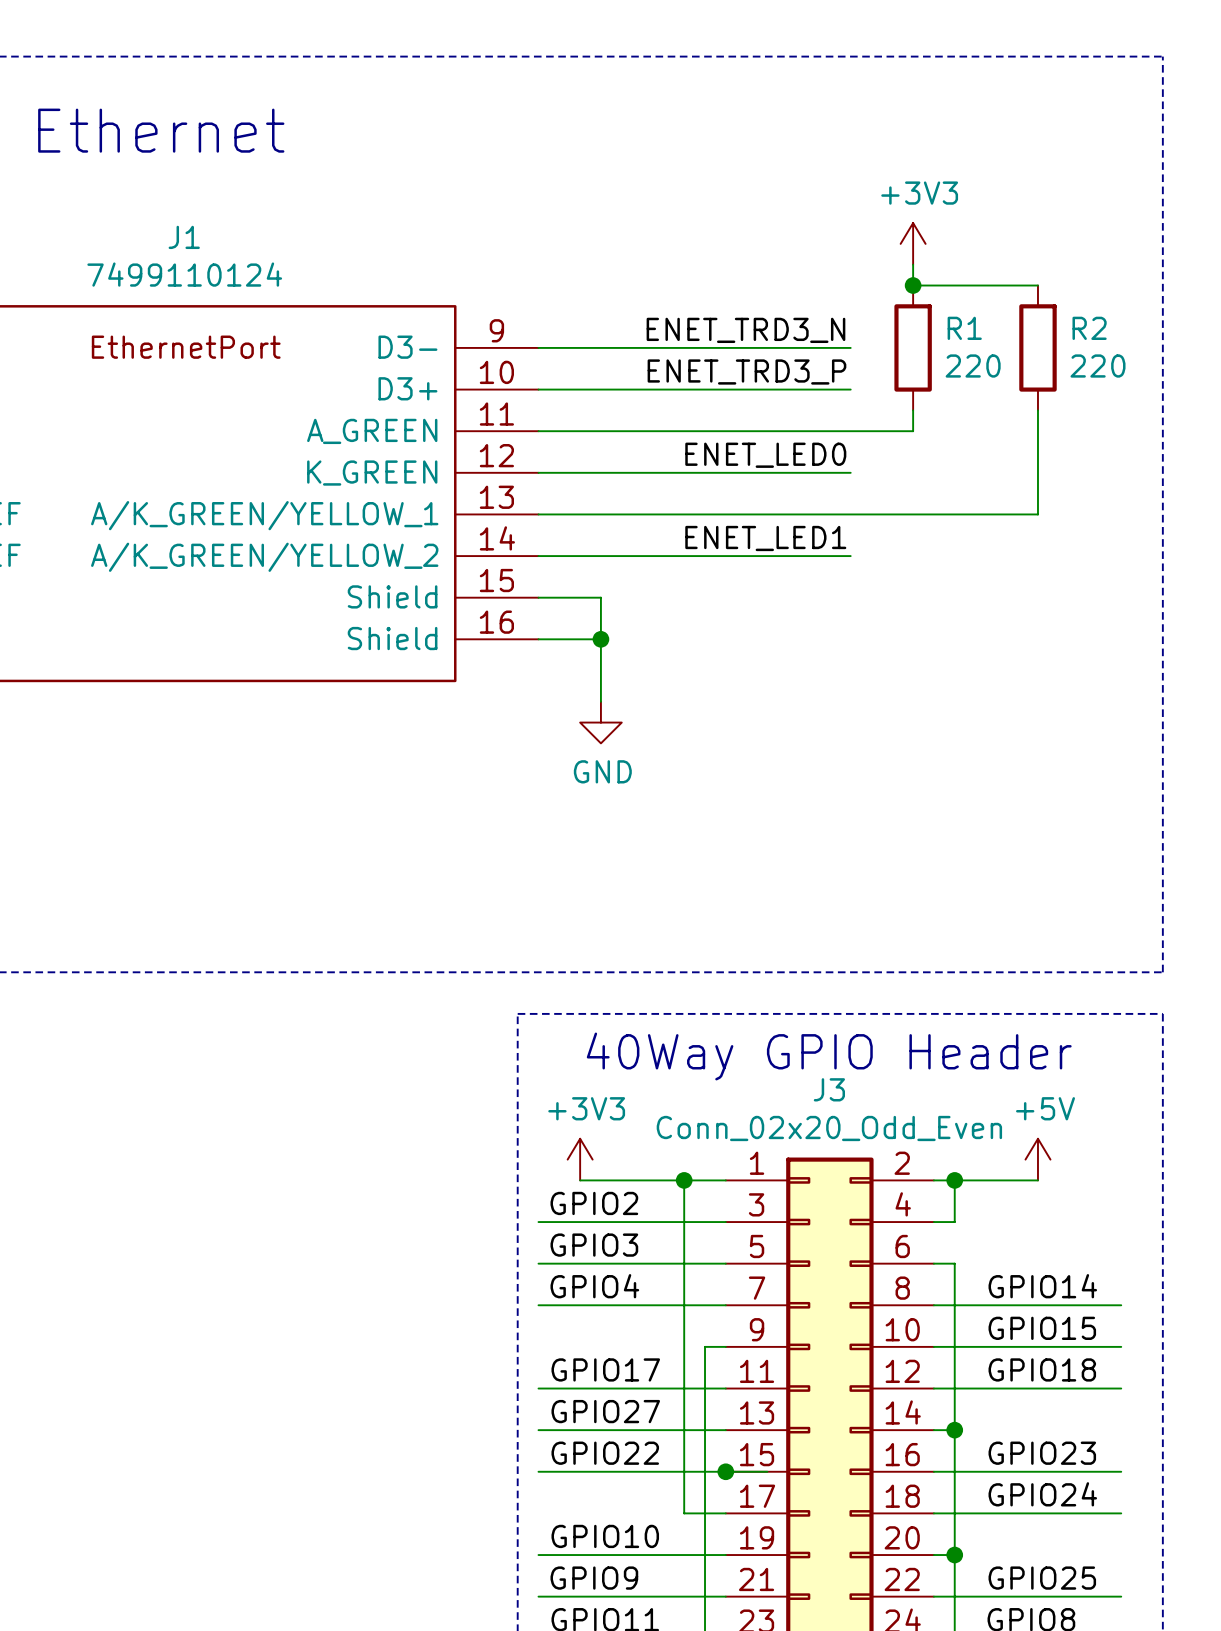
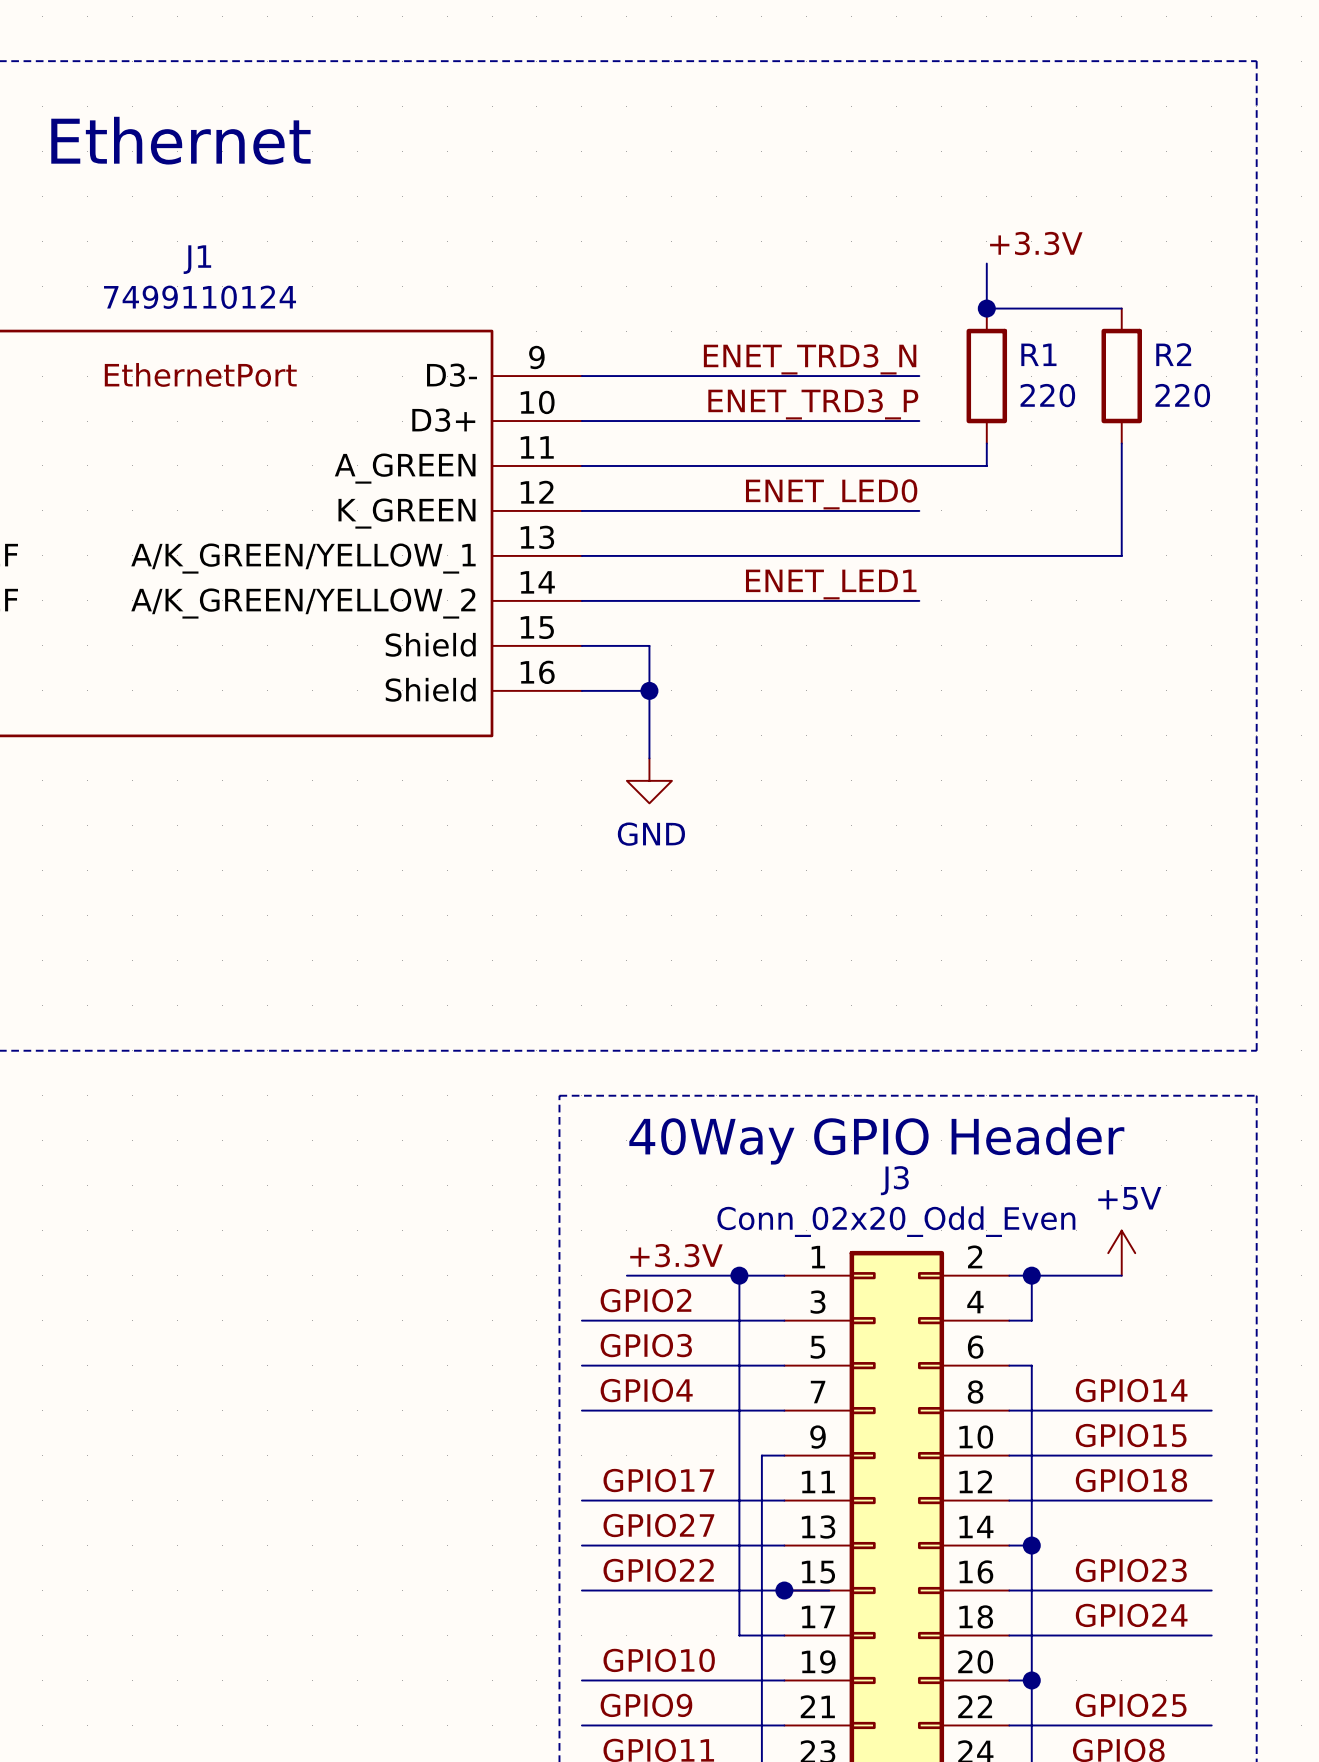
label: none -> +3.3V (1036, 243)
power symbol: +3V3 (913, 243) -> none
power symbol: +3V3 (580, 1159) -> none
label: none -> +3.3V (676, 1255)

